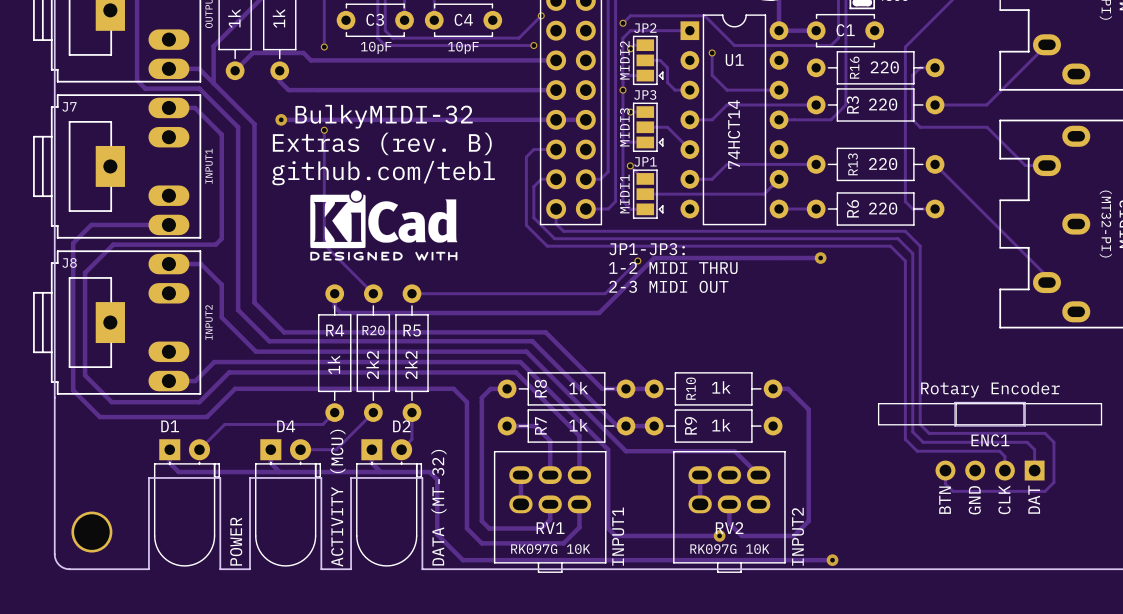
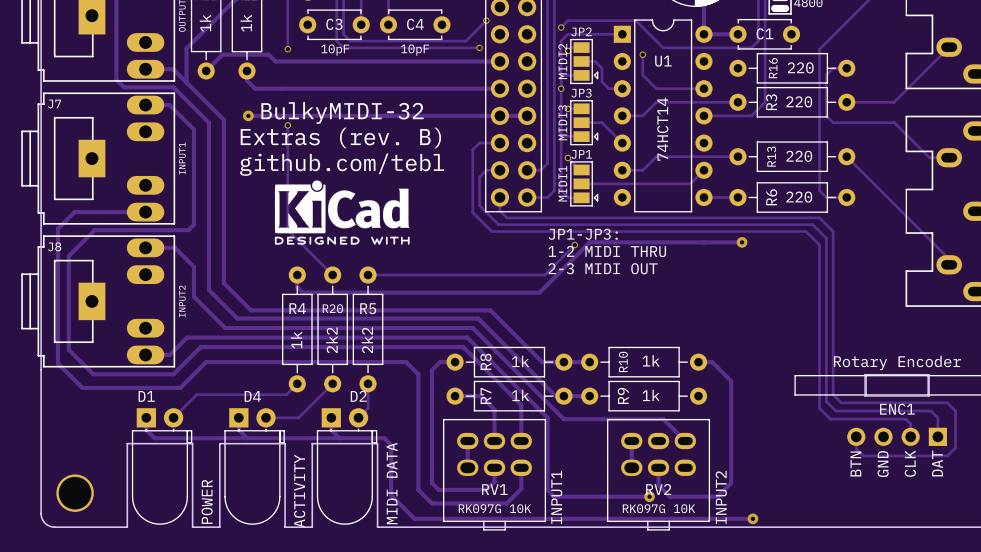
D4 value: ACTIVITY (MCU) (337, 498) -> ACTIVITY (299, 491)
D2 value: DATA (MT-32) (438, 507) -> MIDI DATA (392, 483)

